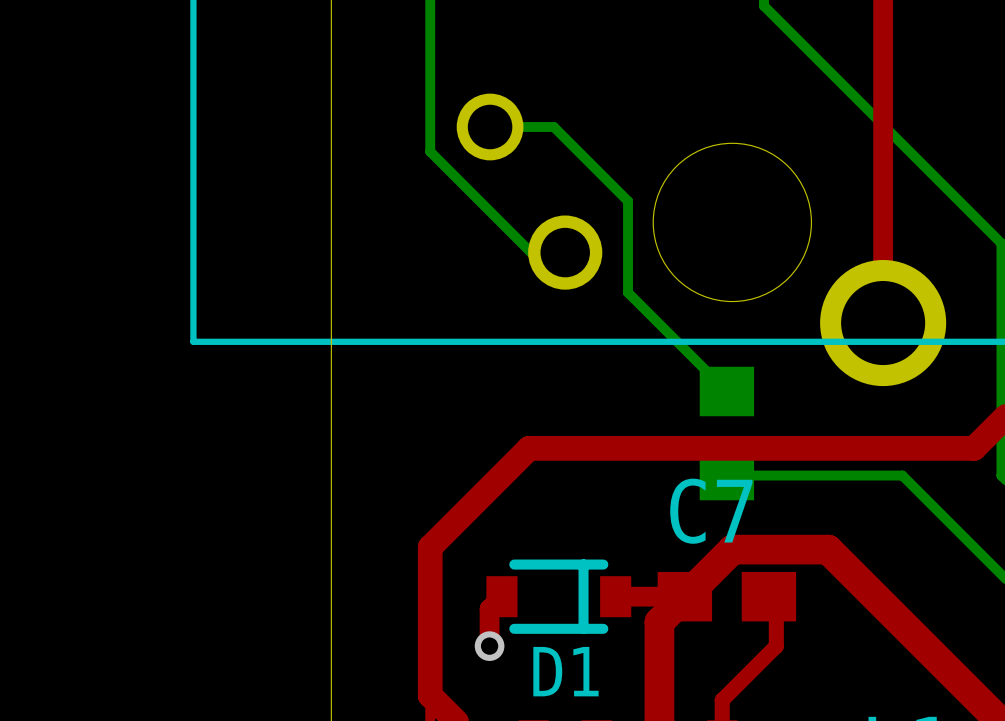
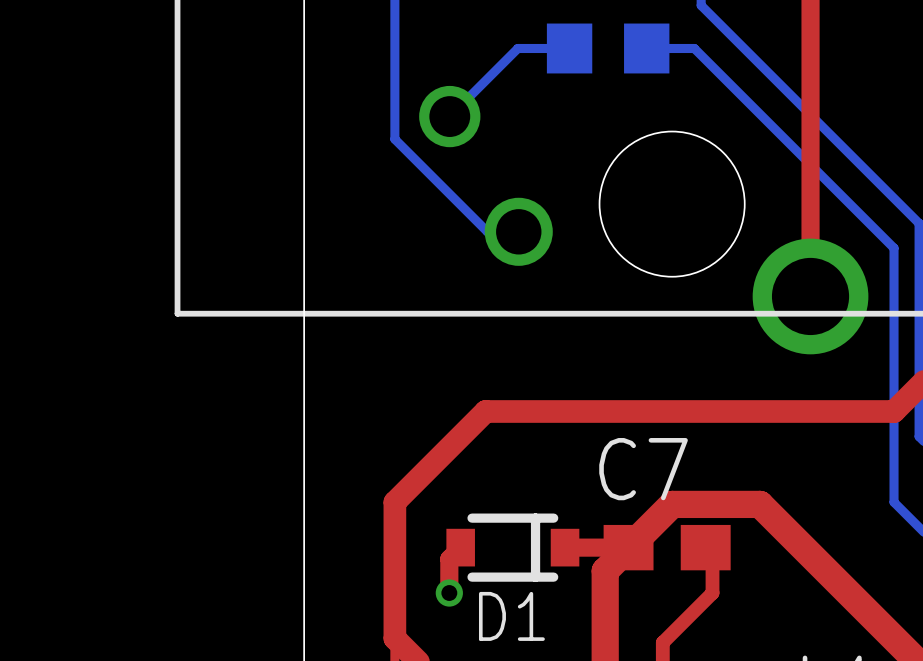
bottom track: (490, 126) (553, 126) (628, 201) (628, 292) (726, 391) -> (449, 116) (517, 48) (569, 48)
part rotation: 0° (726, 433) -> 90° clockwise (608, 48)
part position: (726, 433) -> (608, 48)
bottom track: (726, 475) (902, 475) (974, 547) -> (646, 48) (694, 48) (894, 248) (894, 502)

